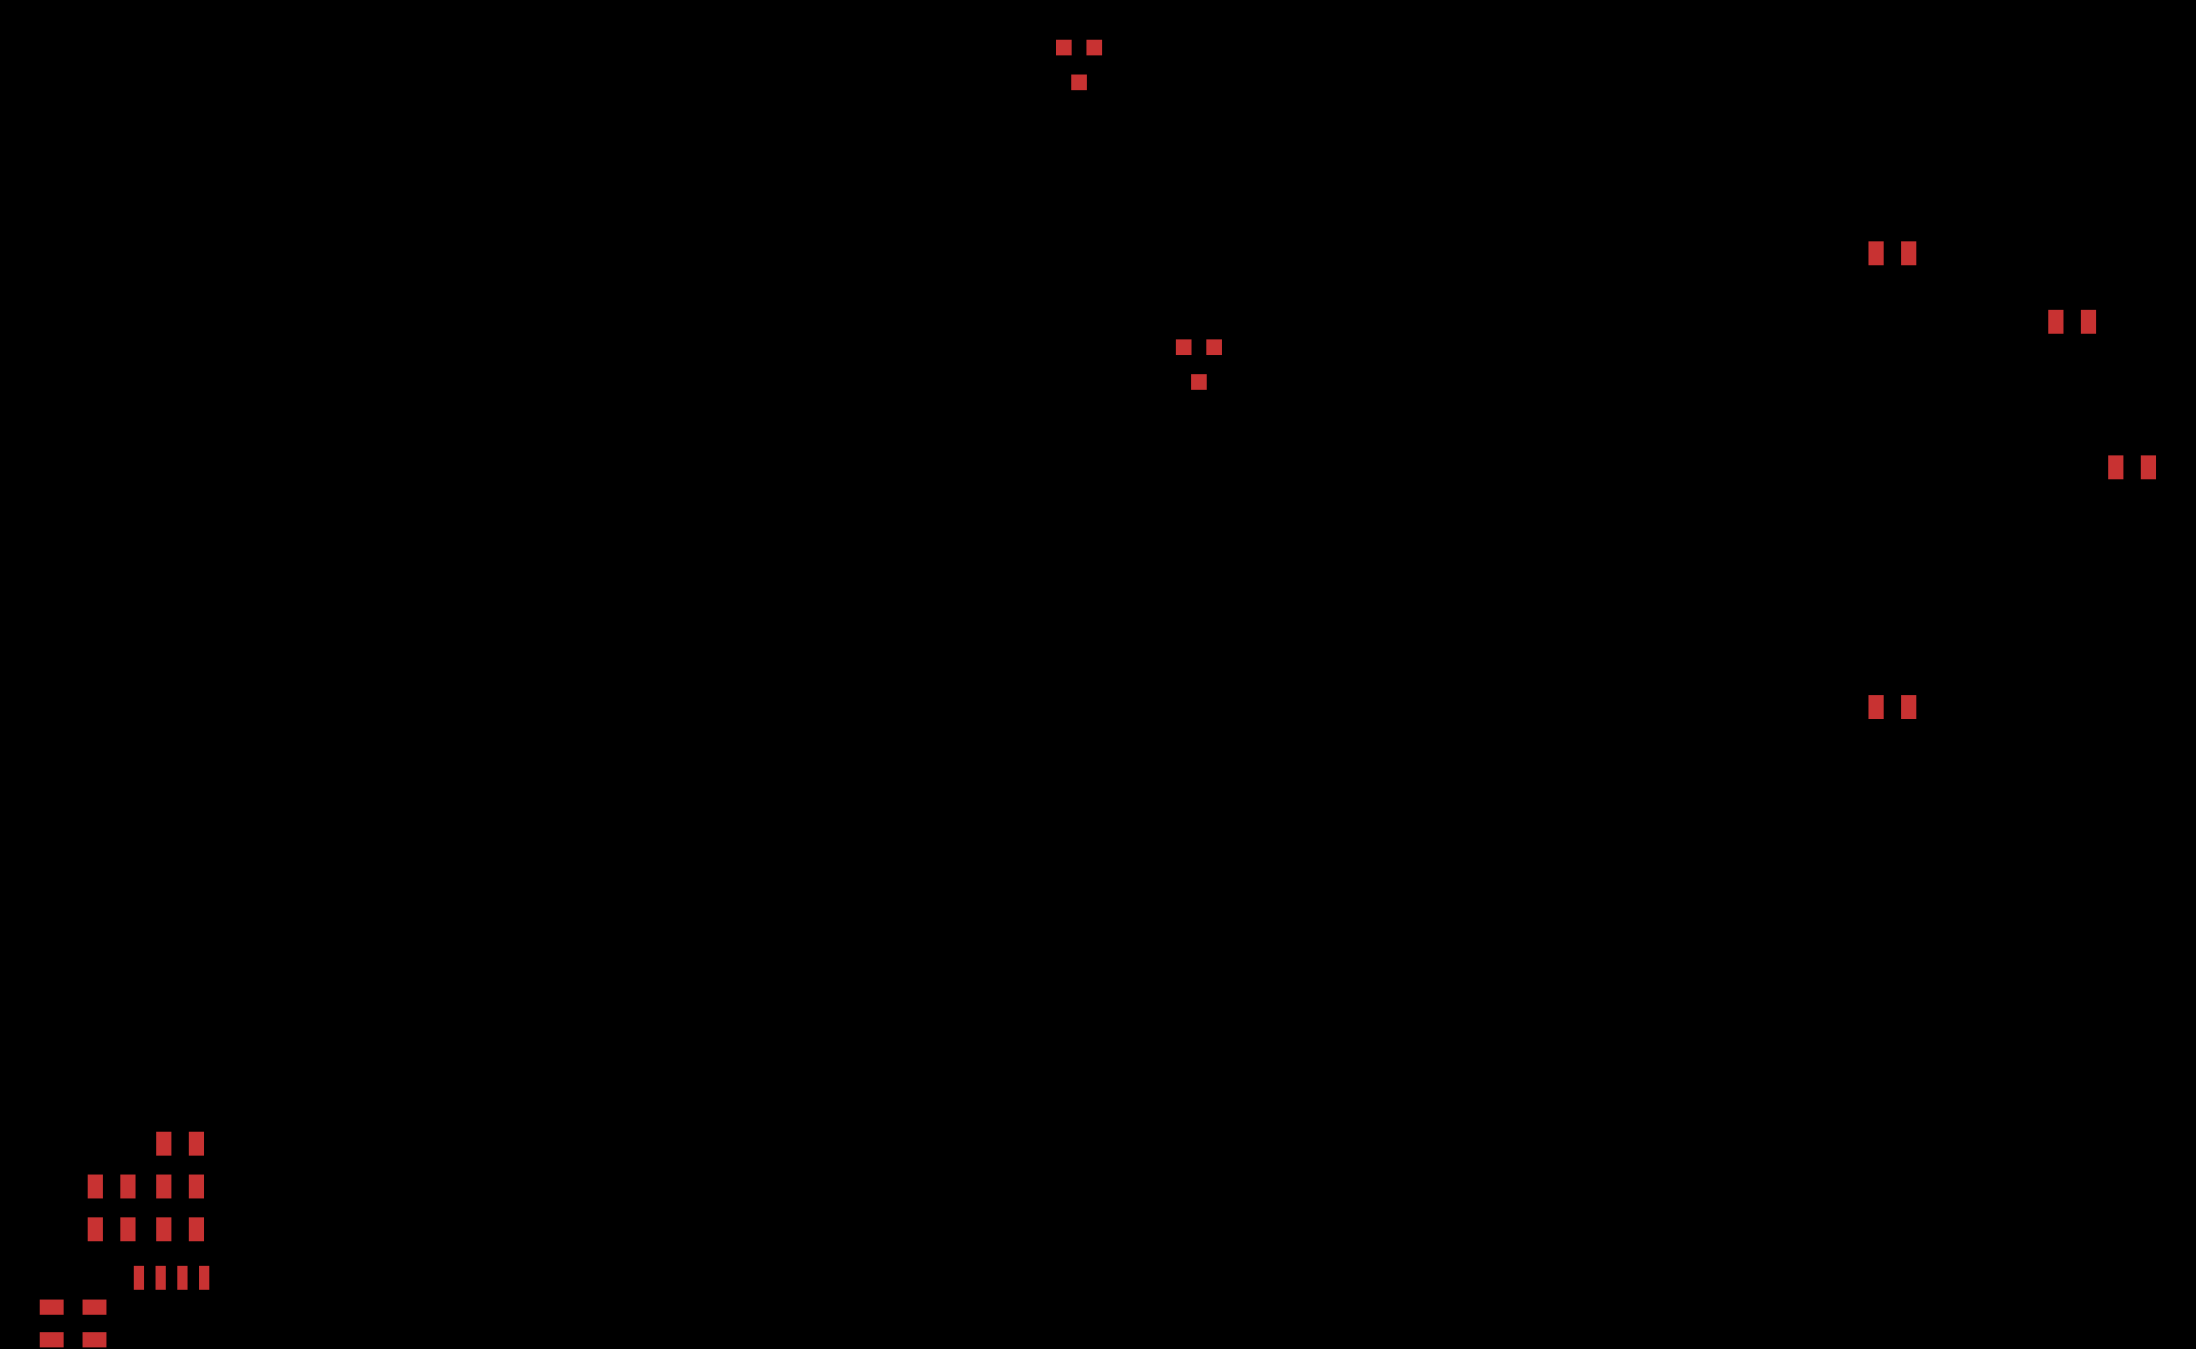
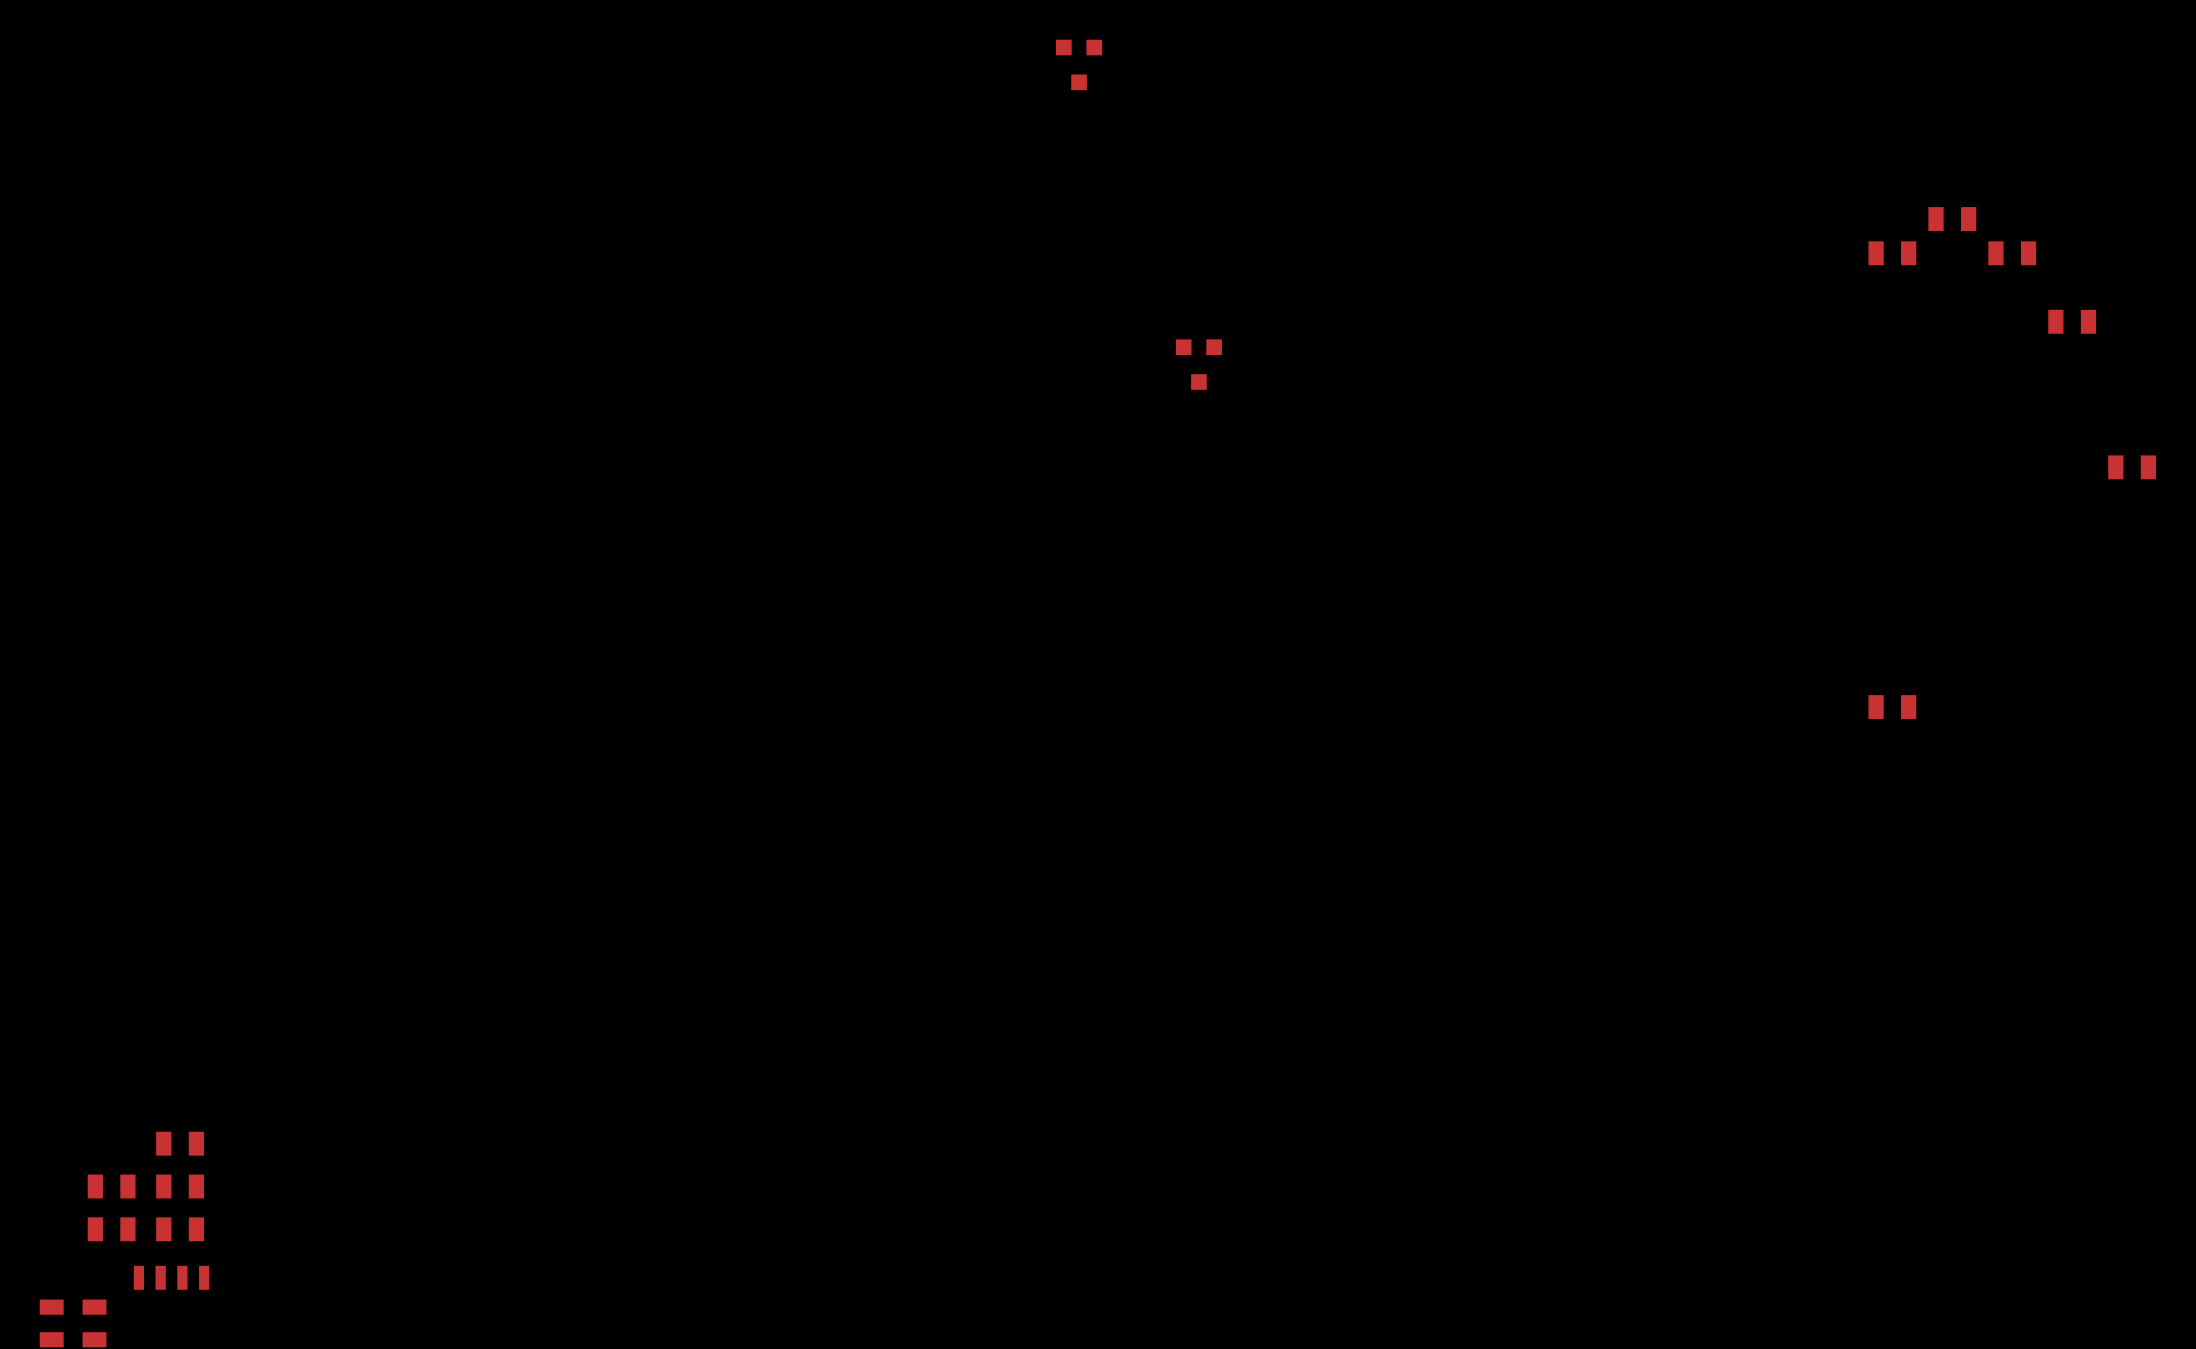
part: none -> (1952, 219)
part: none -> (2012, 253)

